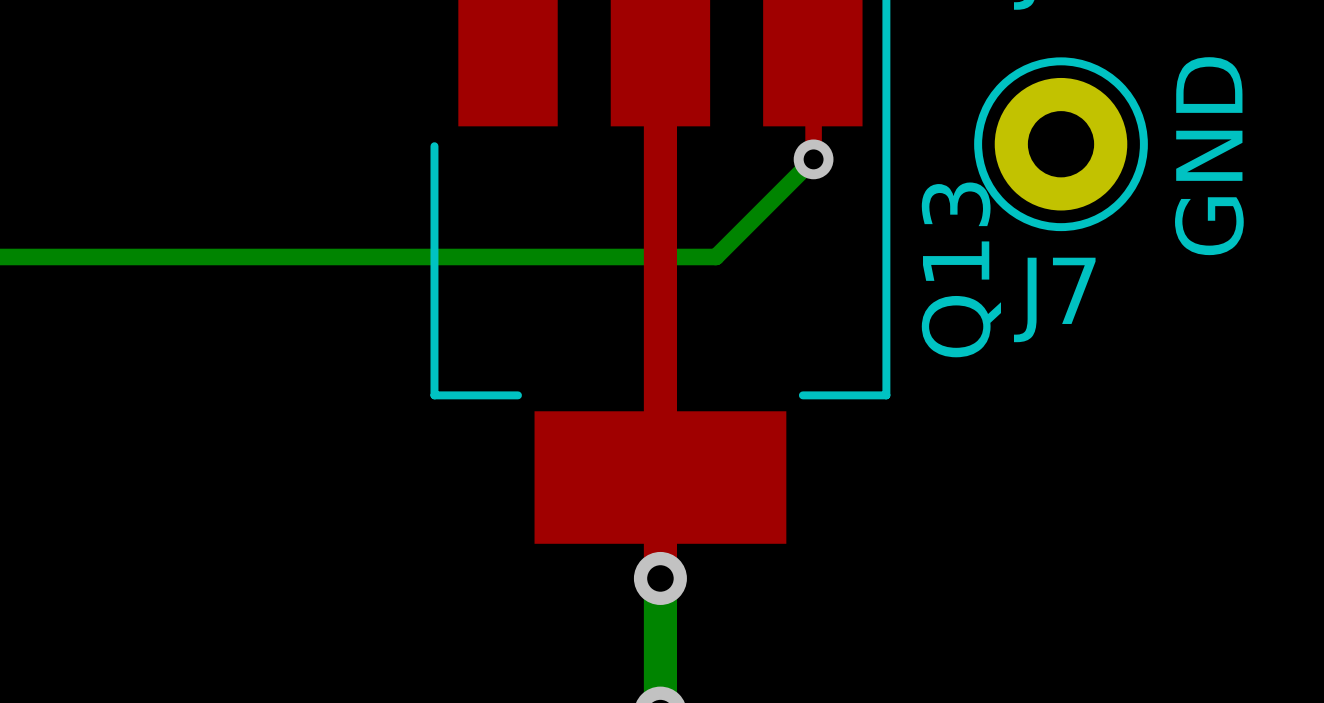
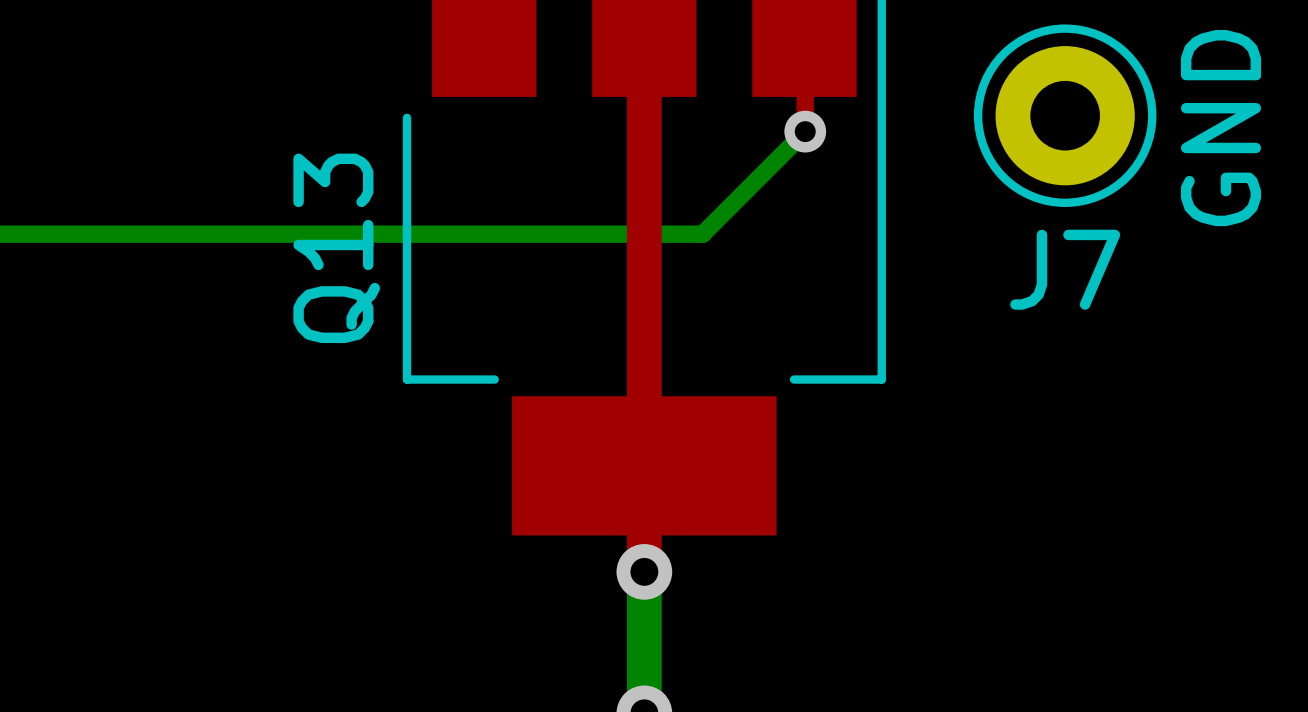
Q13 name position: Q13 (961, 269) -> Q13 (336, 248)

